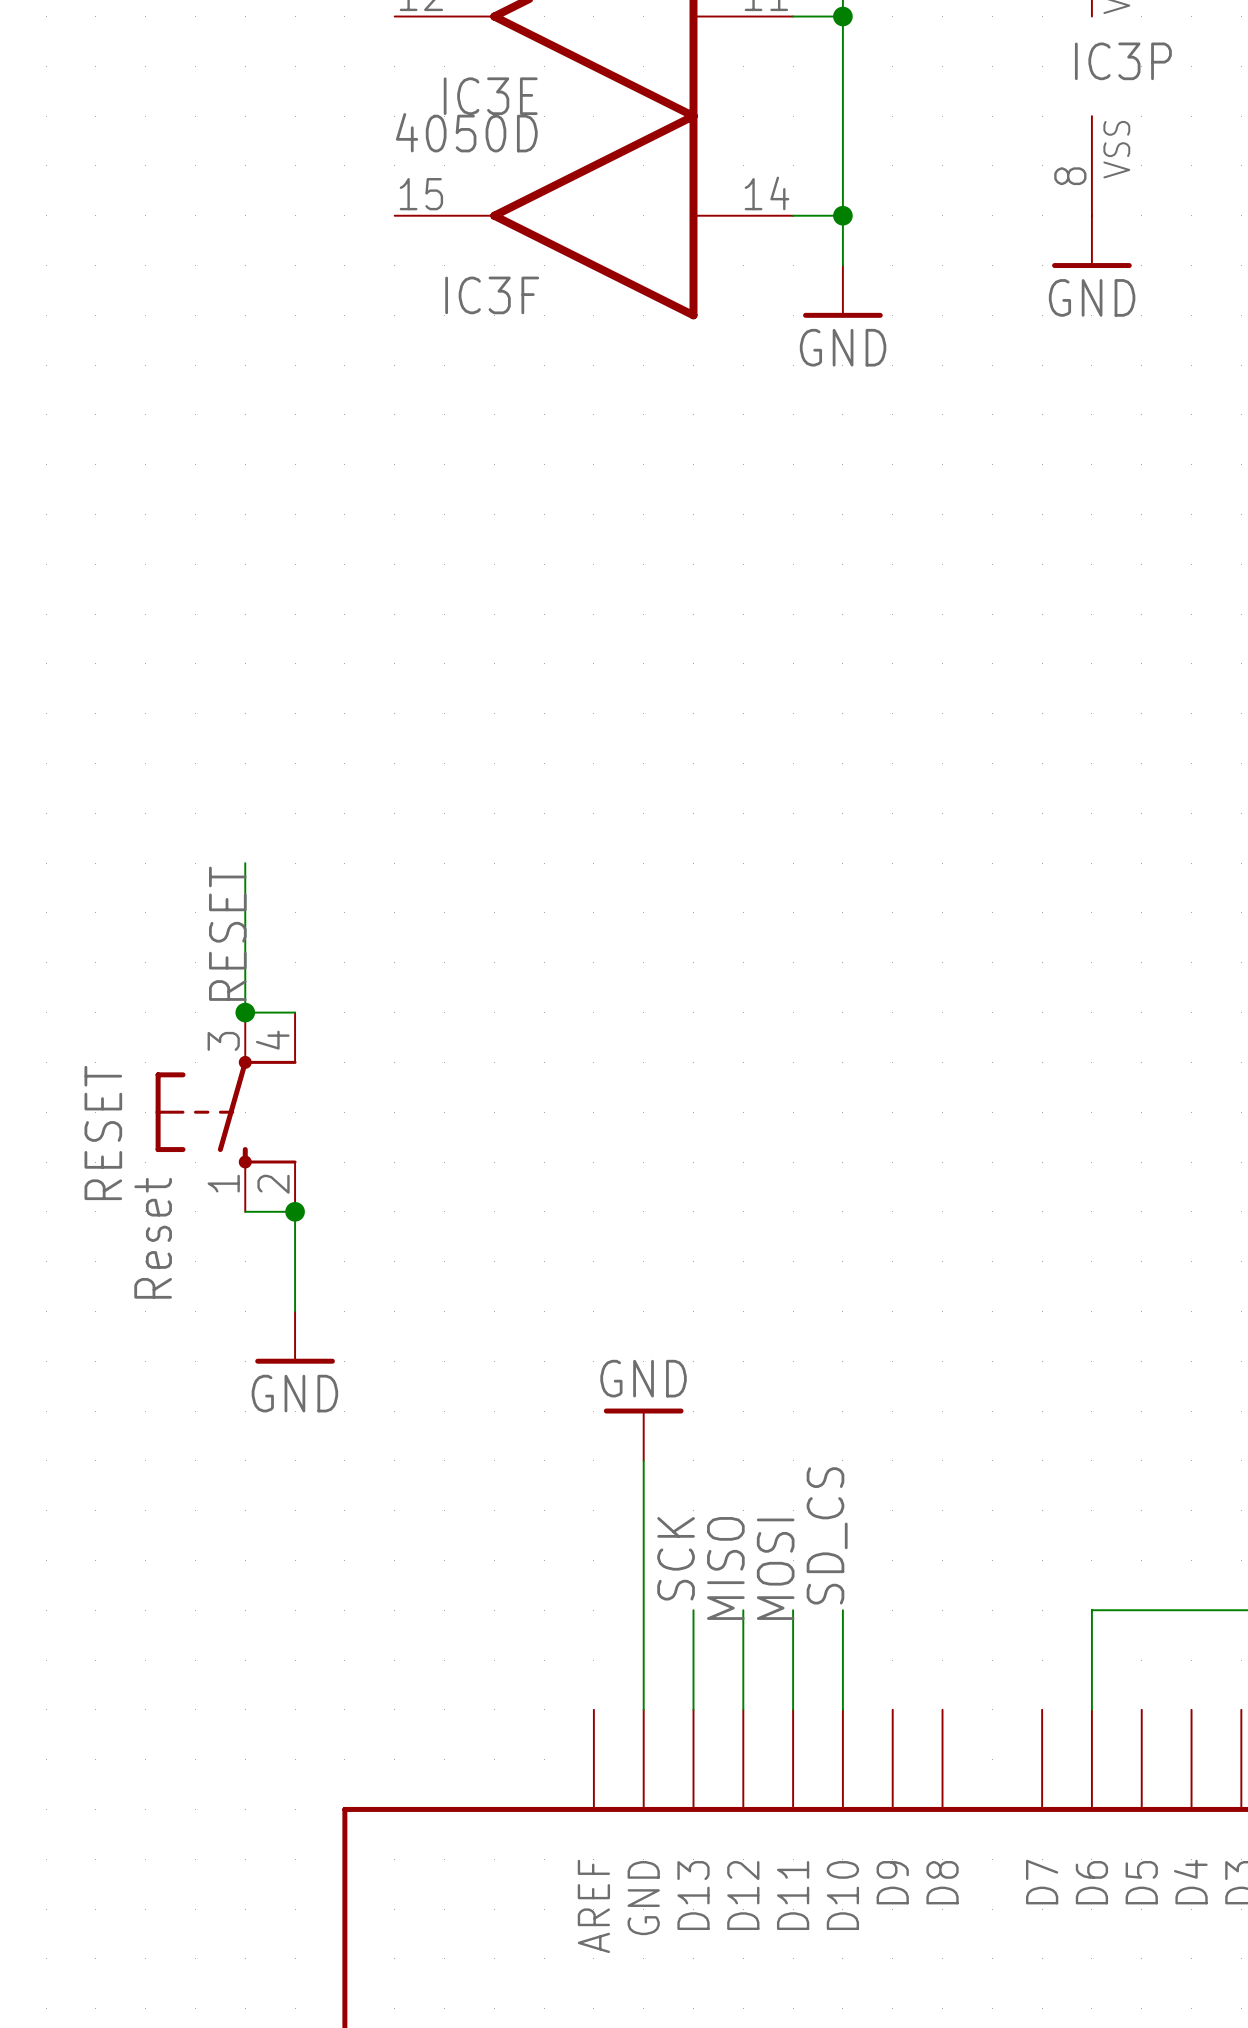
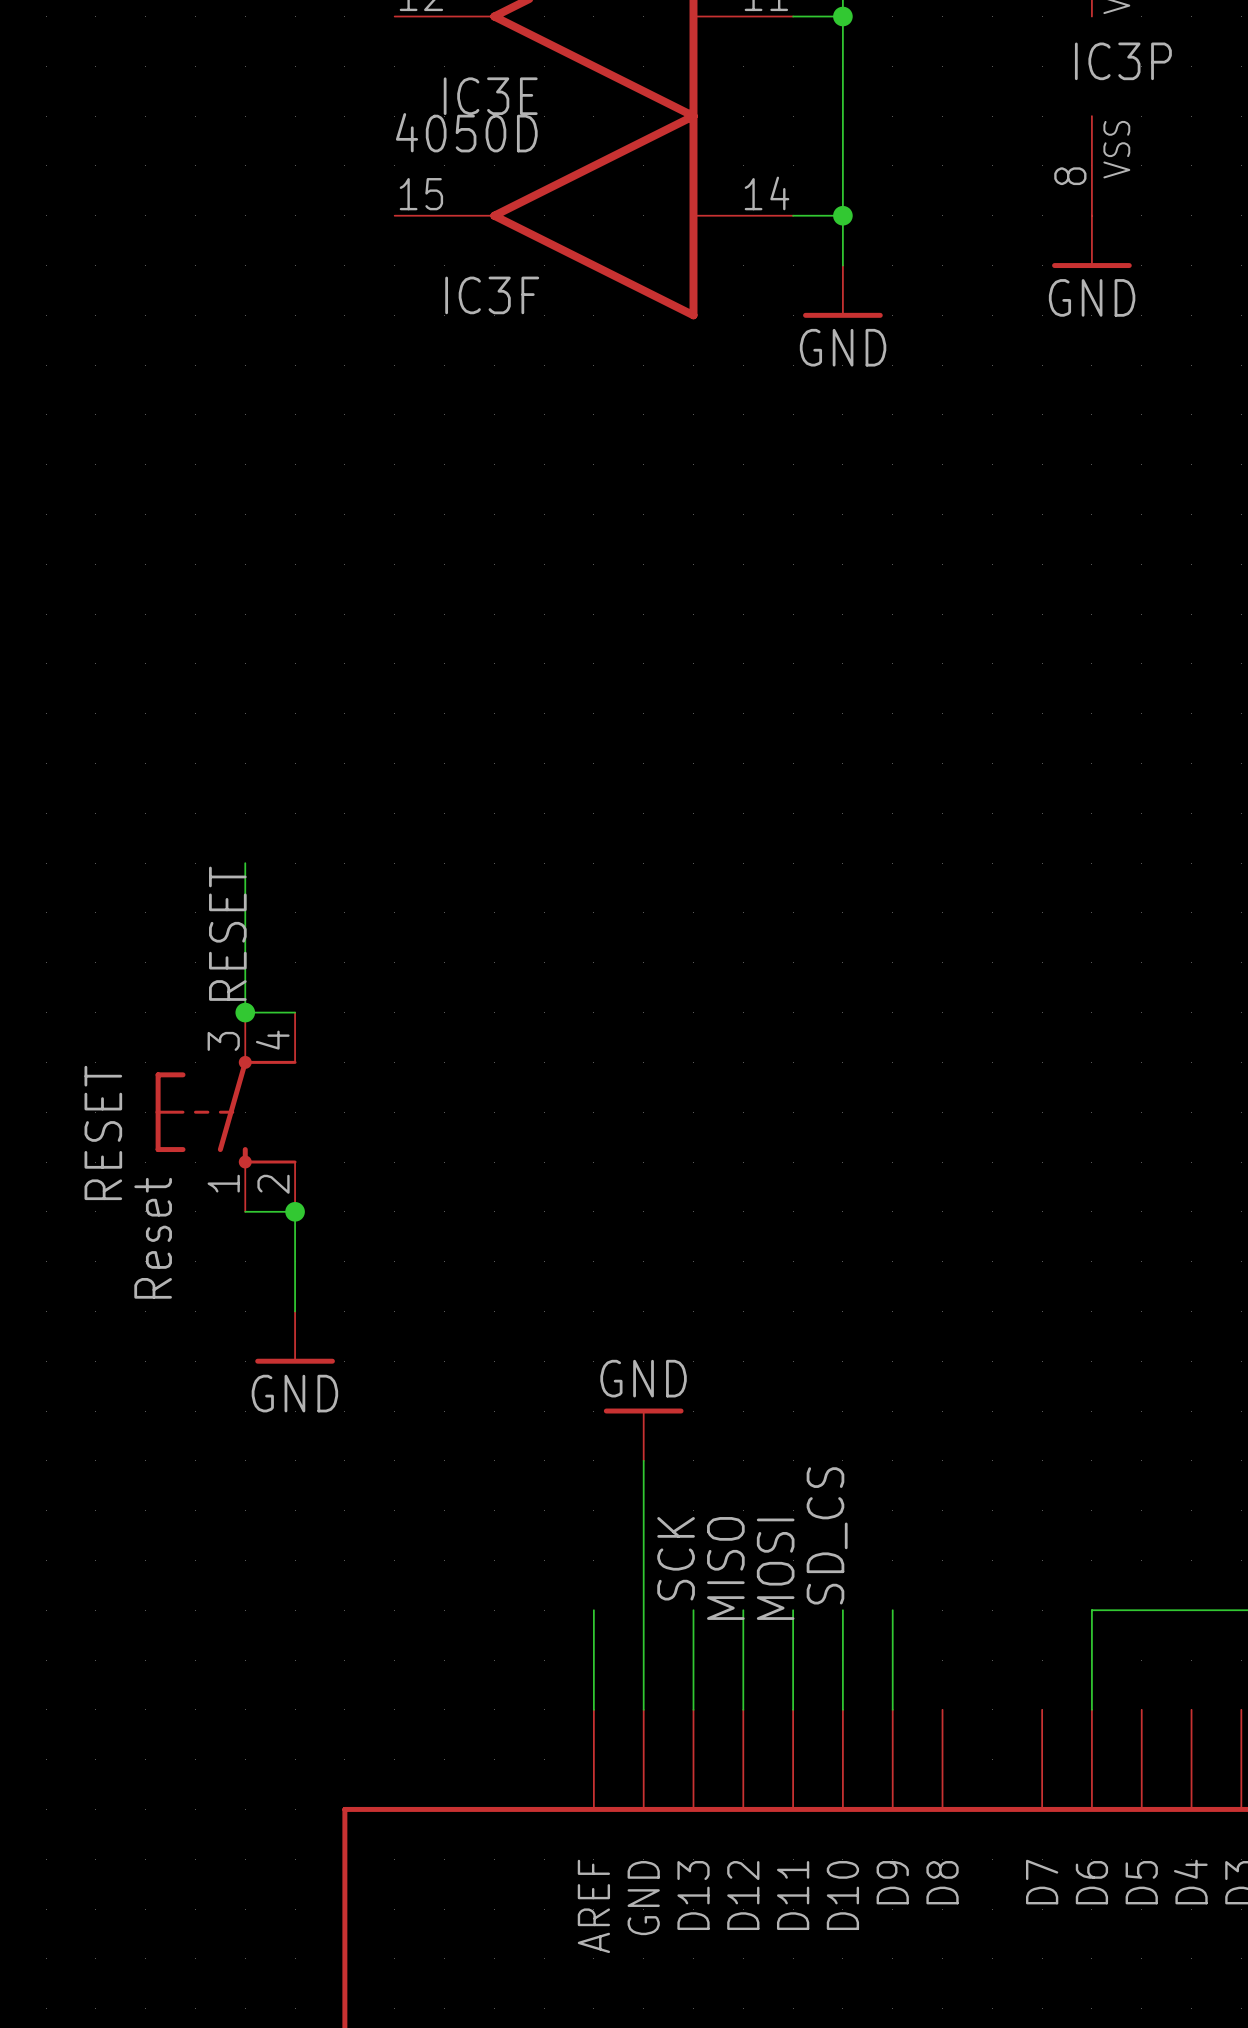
wire: none -> (593, 1610) (593, 1709)
wire: none -> (892, 1610) (892, 1709)

